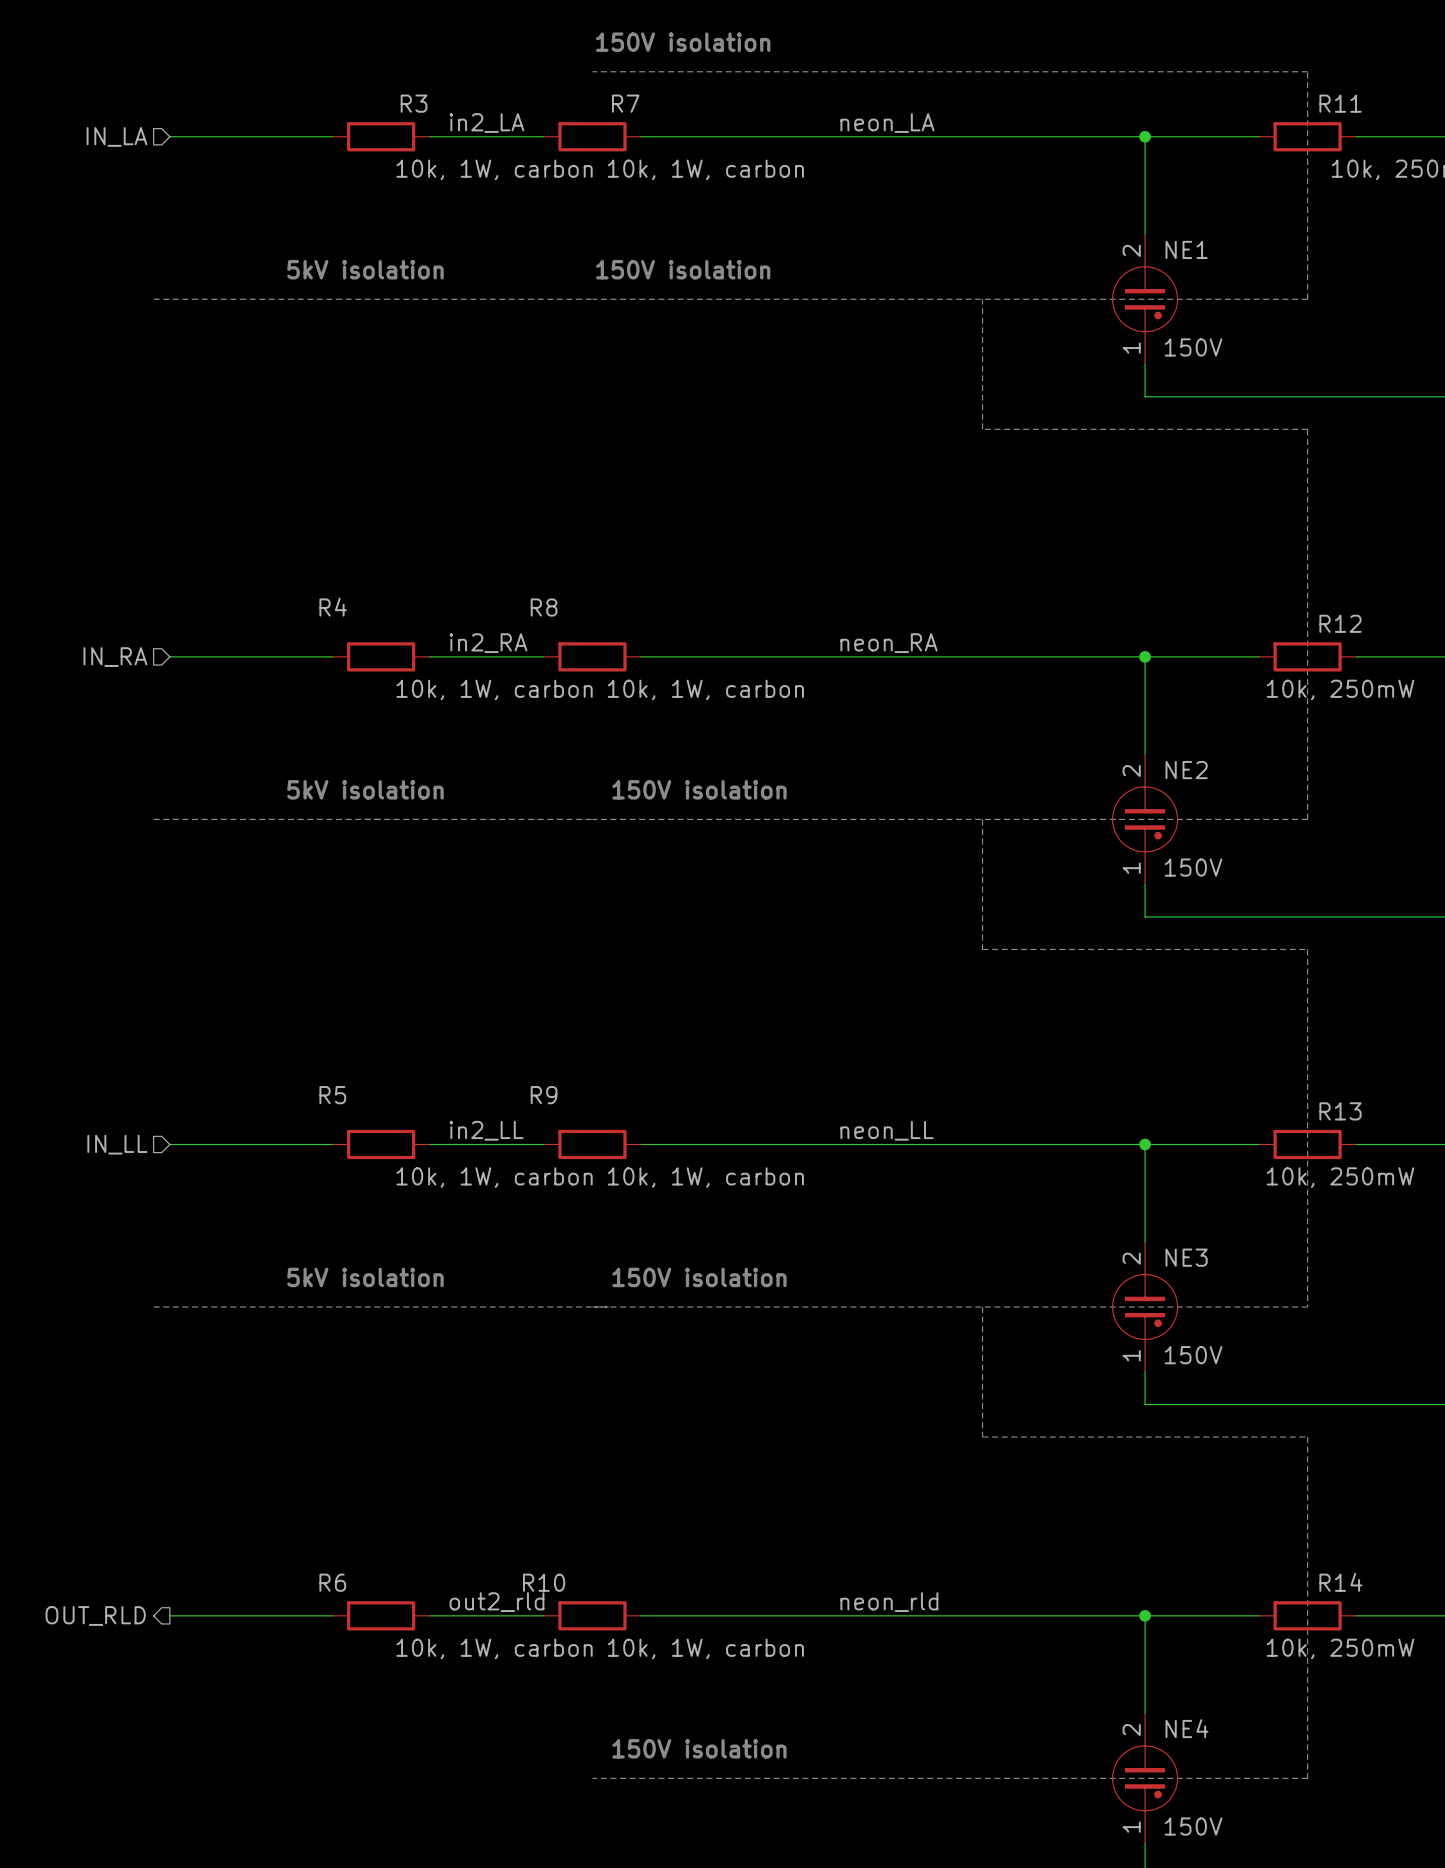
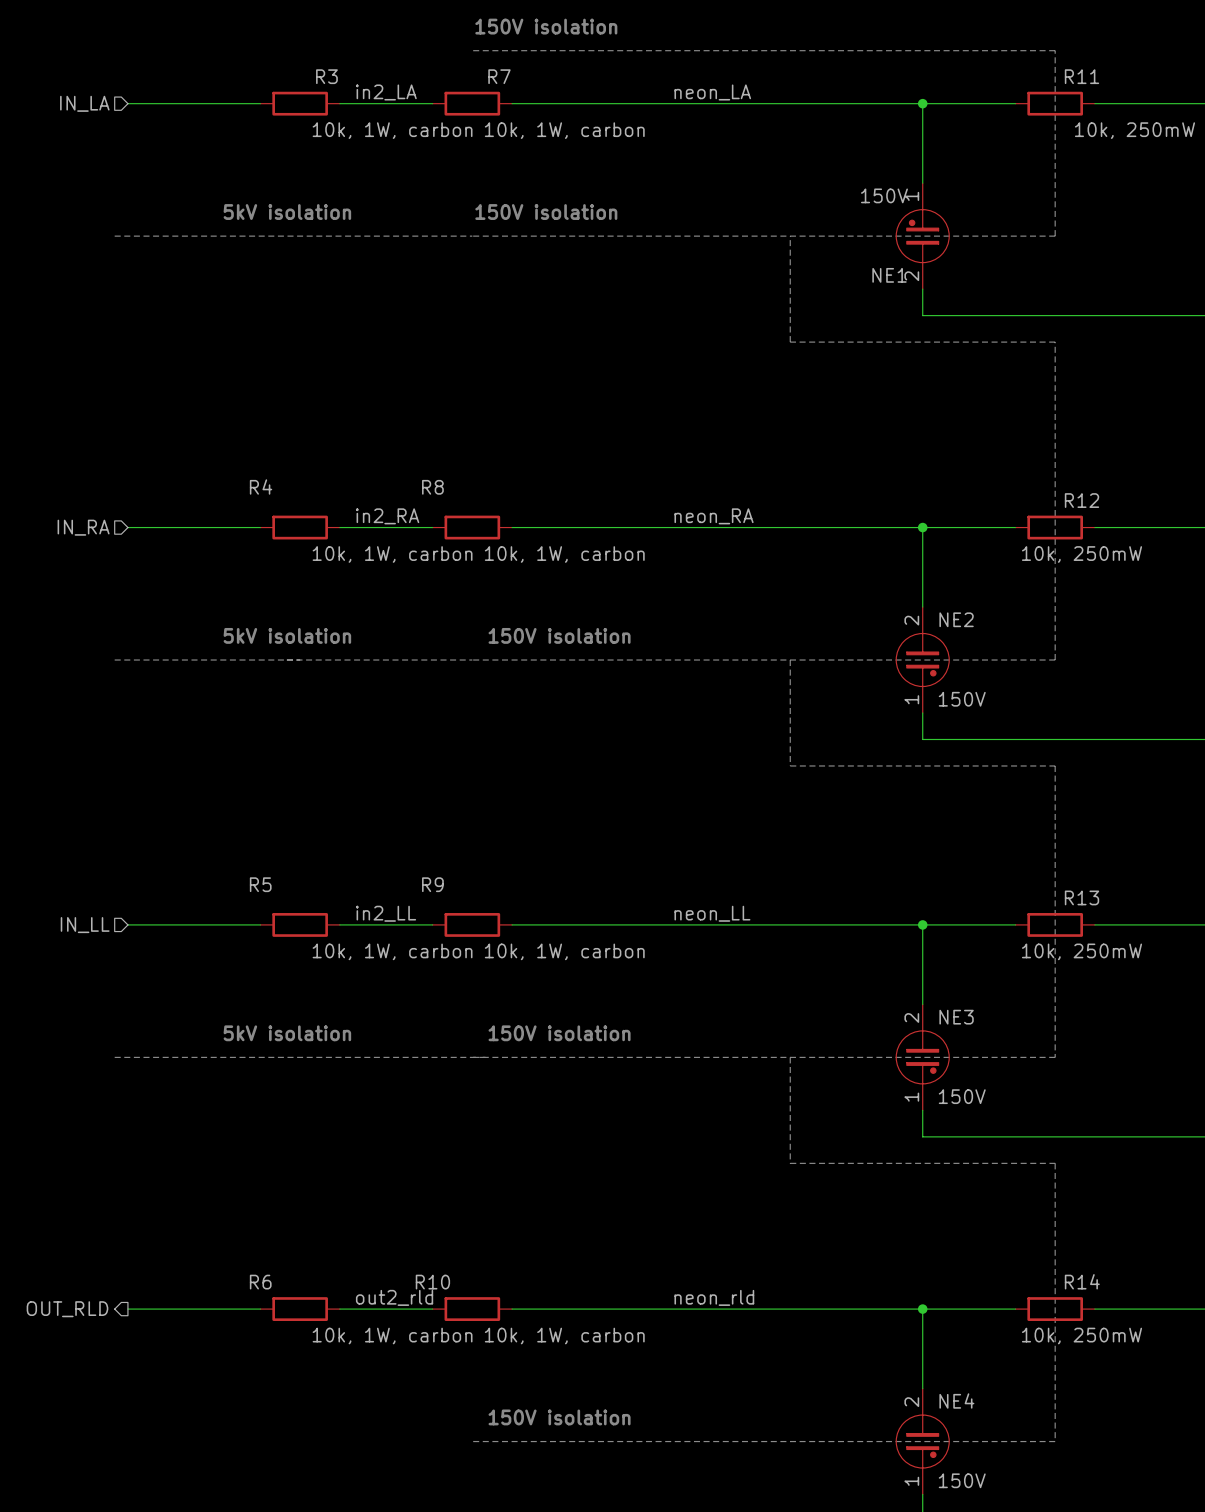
NE1 rotation: 0° (1145, 299) -> 180° (922, 236)

